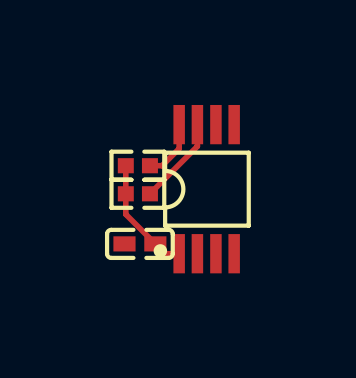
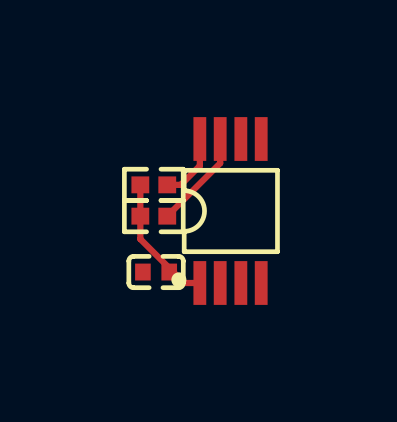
part footprint: [104, 227, 175, 261] -> [126, 254, 186, 291]

